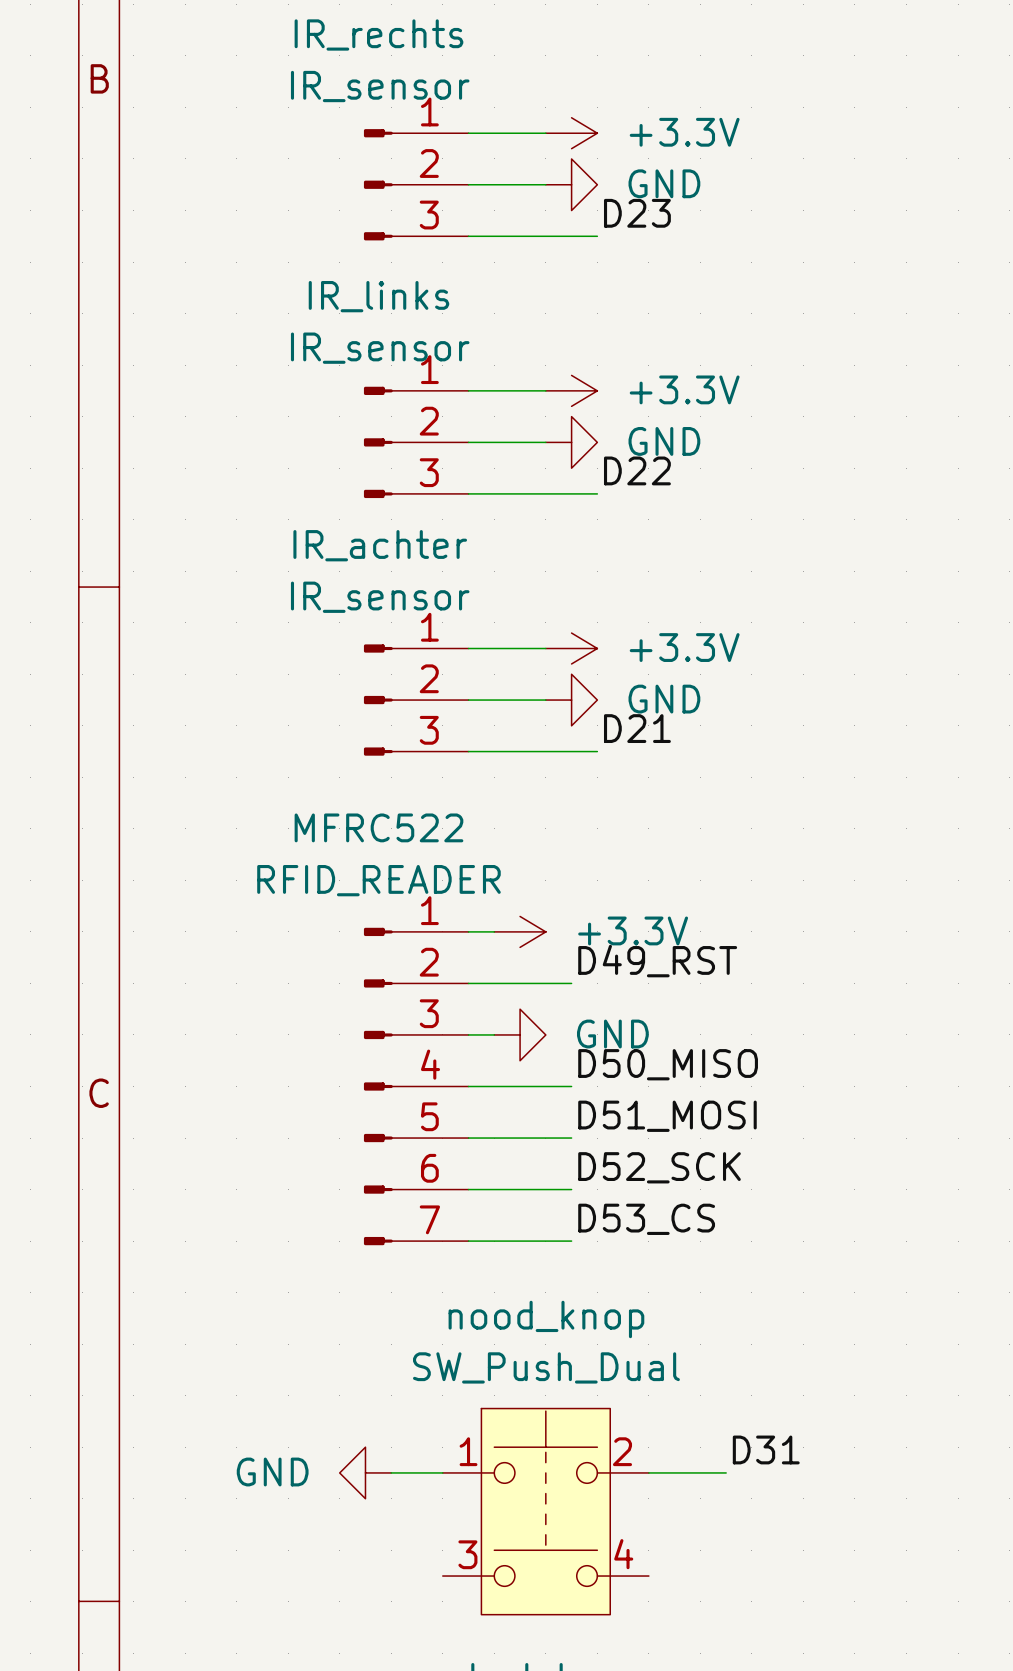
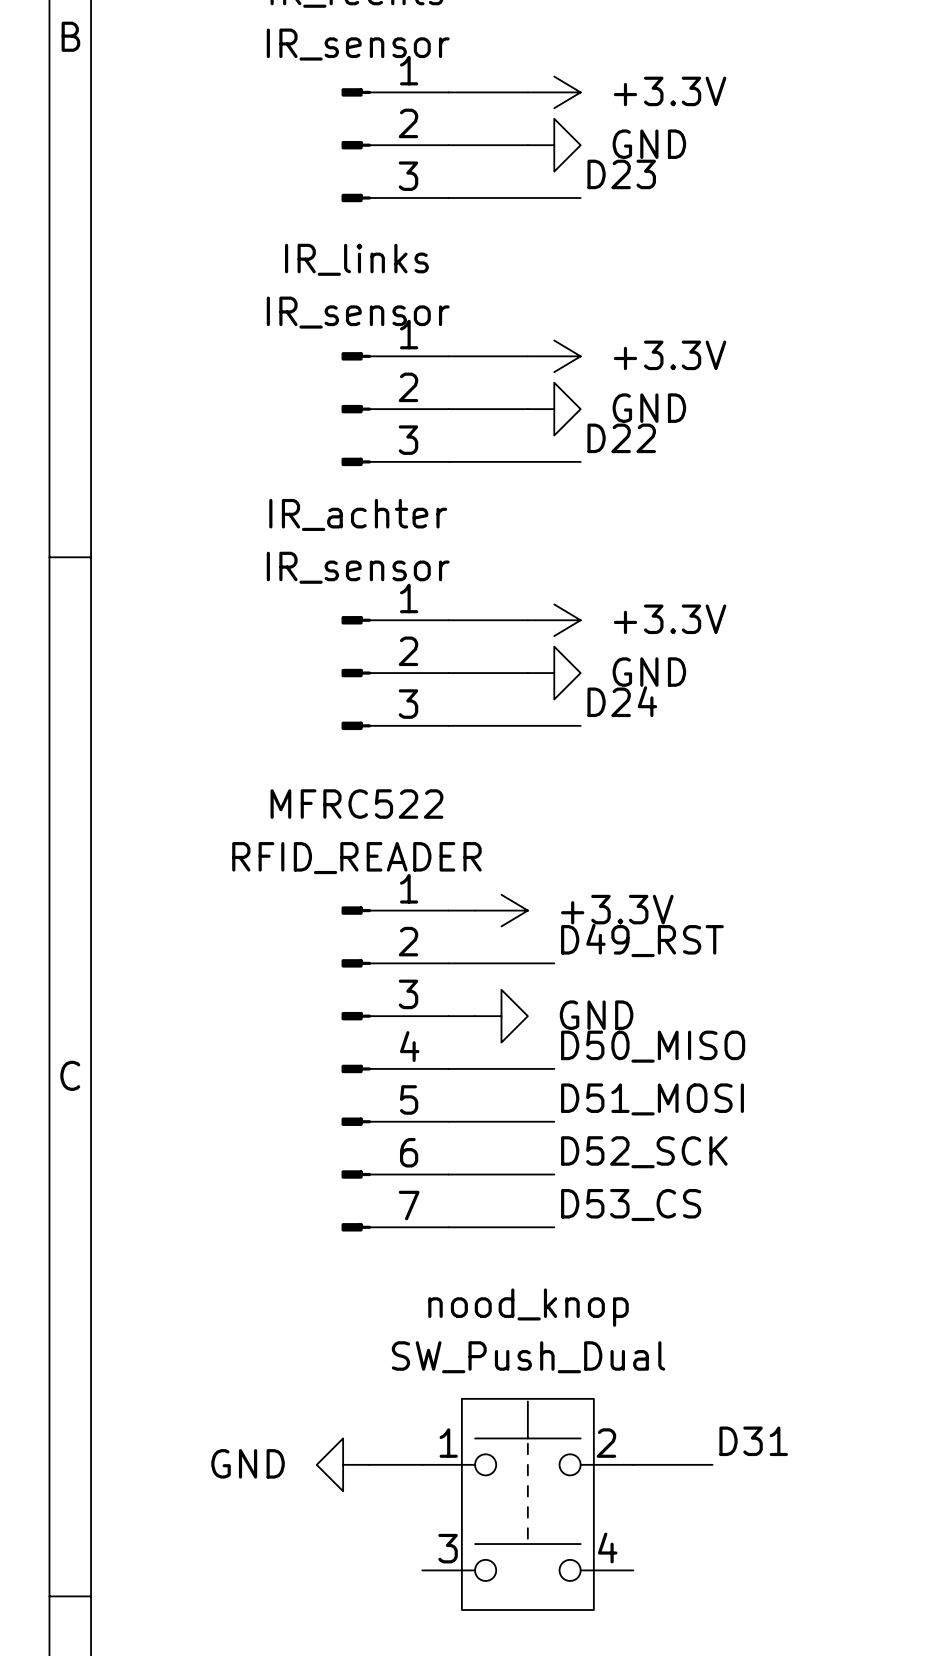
label: D21 (637, 728) -> D24 (622, 701)

